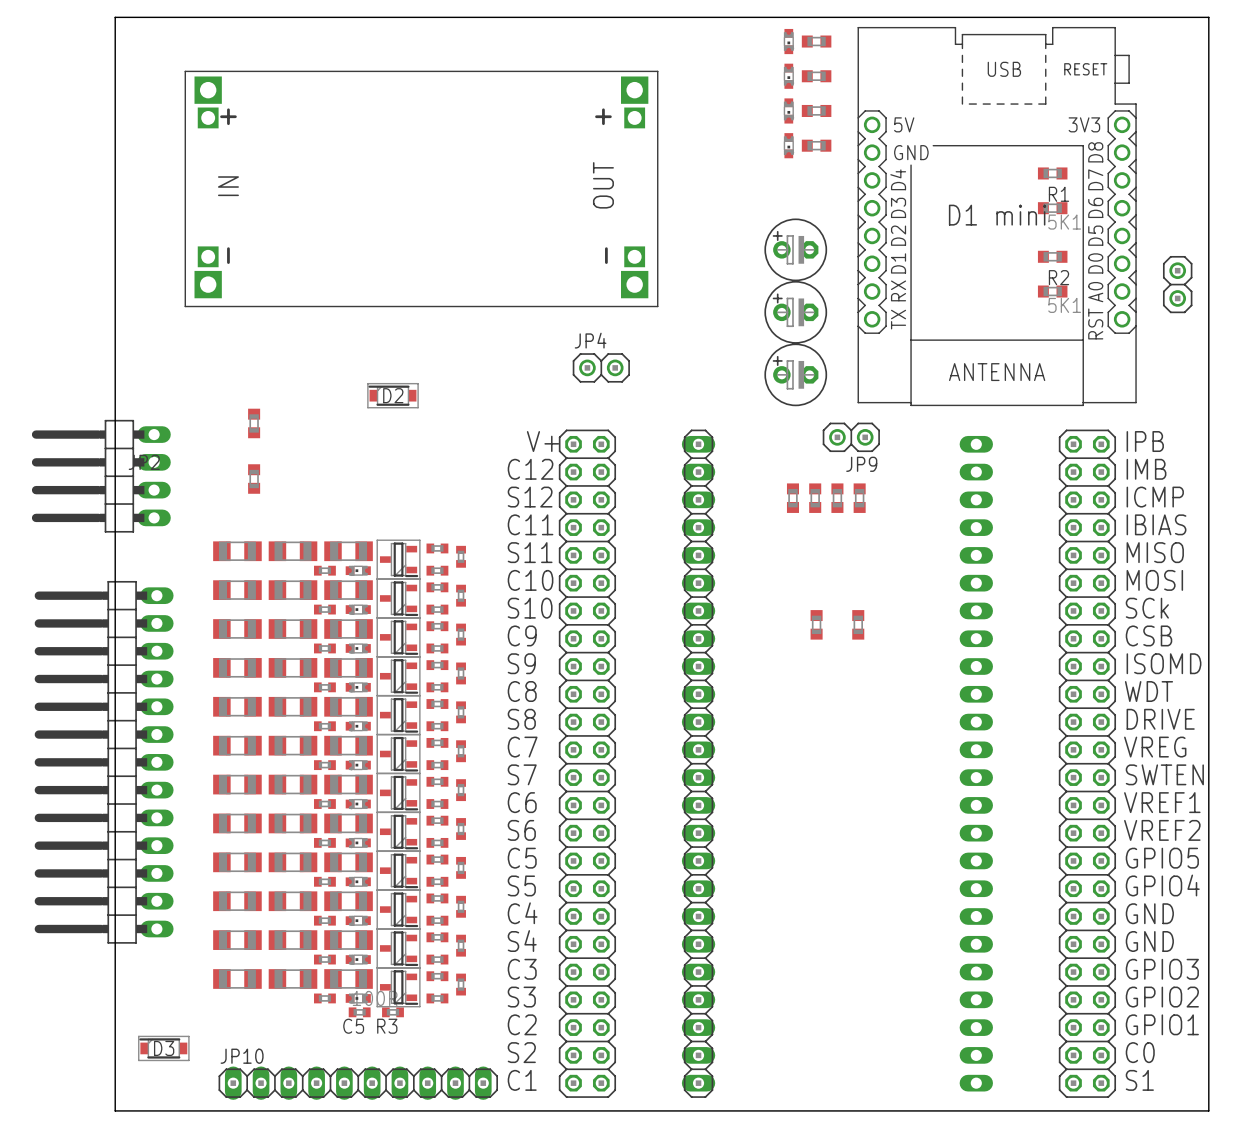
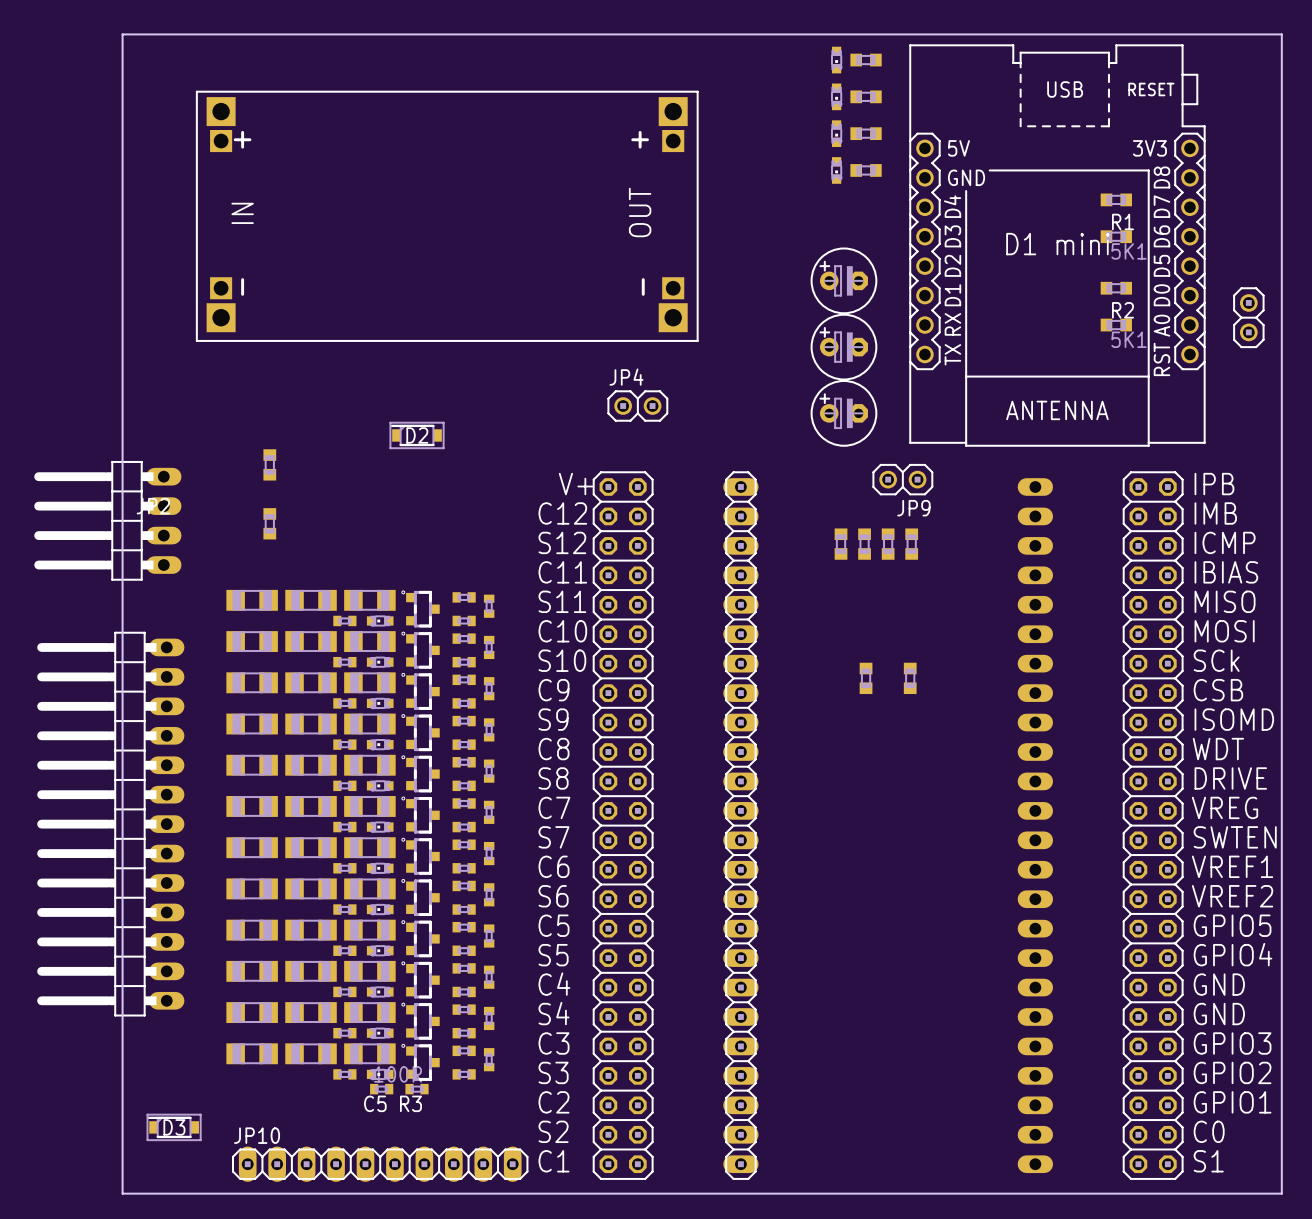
part footprint: [376, 539, 421, 580] -> [401, 590, 440, 628]
part footprint: [376, 578, 421, 619] -> [401, 631, 440, 669]
part footprint: [376, 617, 421, 657] -> [401, 672, 440, 710]
part footprint: [376, 656, 421, 696] -> [401, 714, 440, 752]
part footprint: [376, 695, 421, 735] -> [401, 755, 440, 793]
part footprint: [376, 734, 421, 774] -> [401, 796, 440, 834]
part footprint: [376, 773, 421, 813] -> [401, 837, 440, 875]
part footprint: [376, 812, 421, 852] -> [401, 879, 440, 917]
part footprint: [376, 851, 421, 891] -> [401, 920, 440, 958]
part footprint: [376, 889, 421, 930] -> [401, 961, 440, 999]
part footprint: [376, 928, 421, 969] -> [401, 1002, 440, 1040]
part footprint: [376, 967, 421, 1007] -> [401, 1043, 440, 1081]

